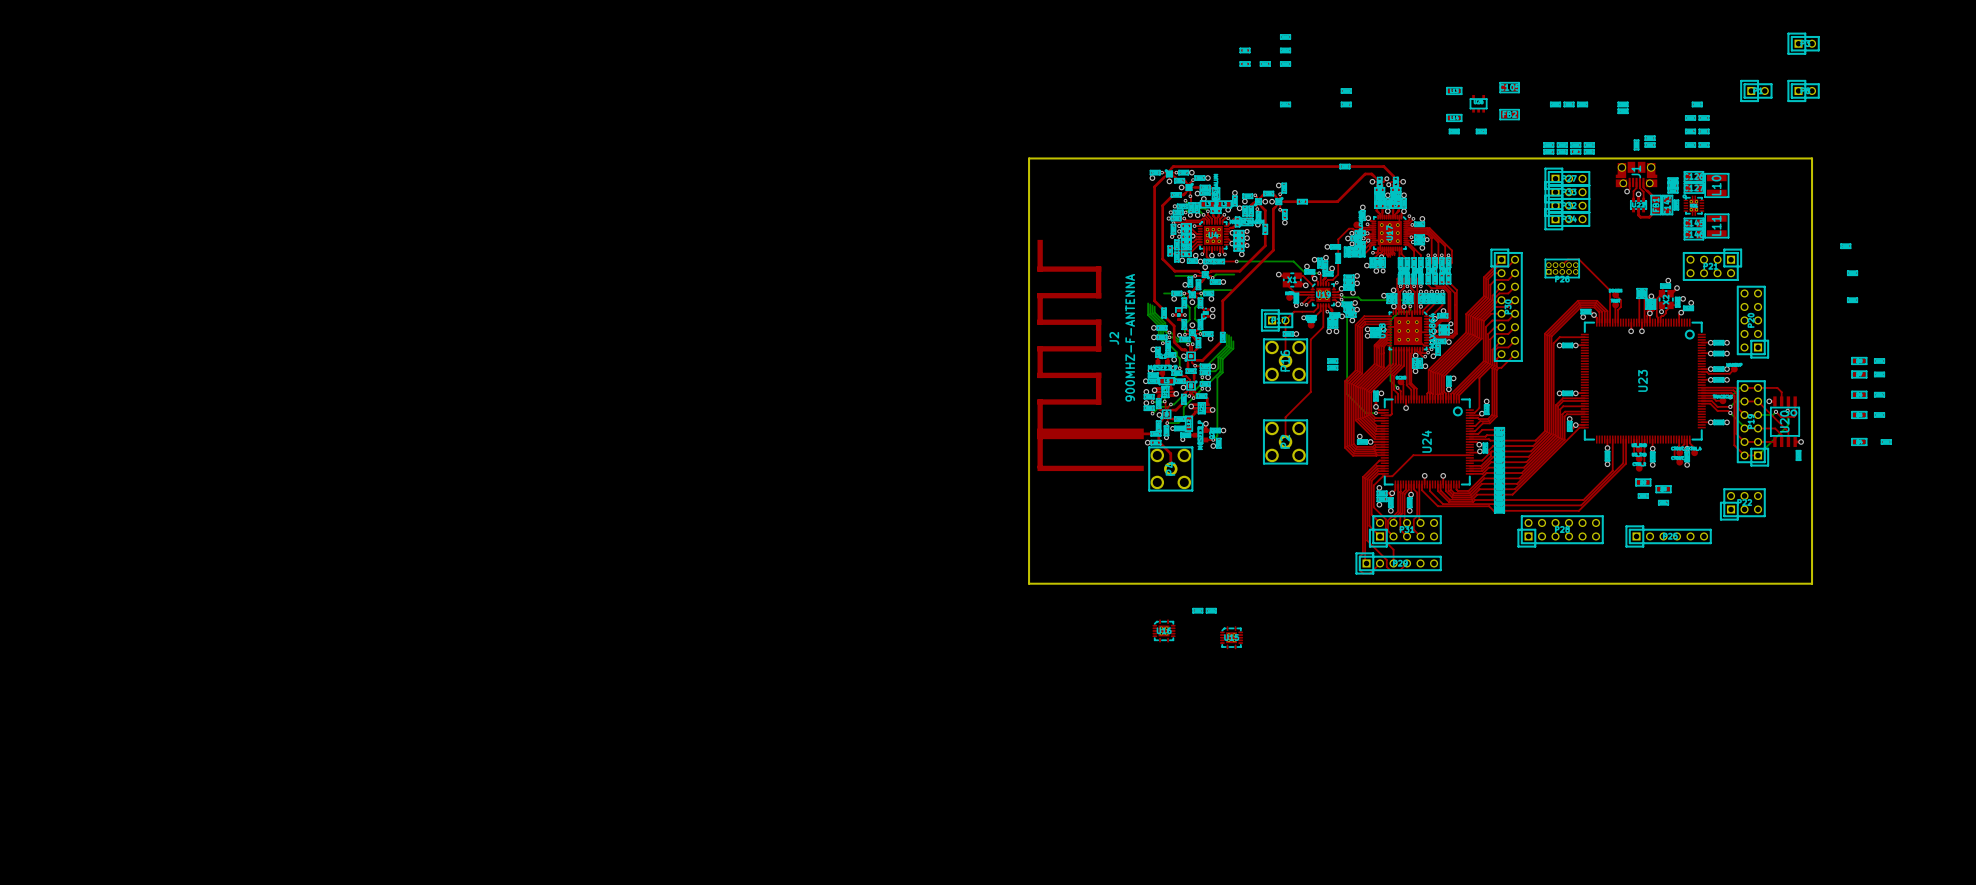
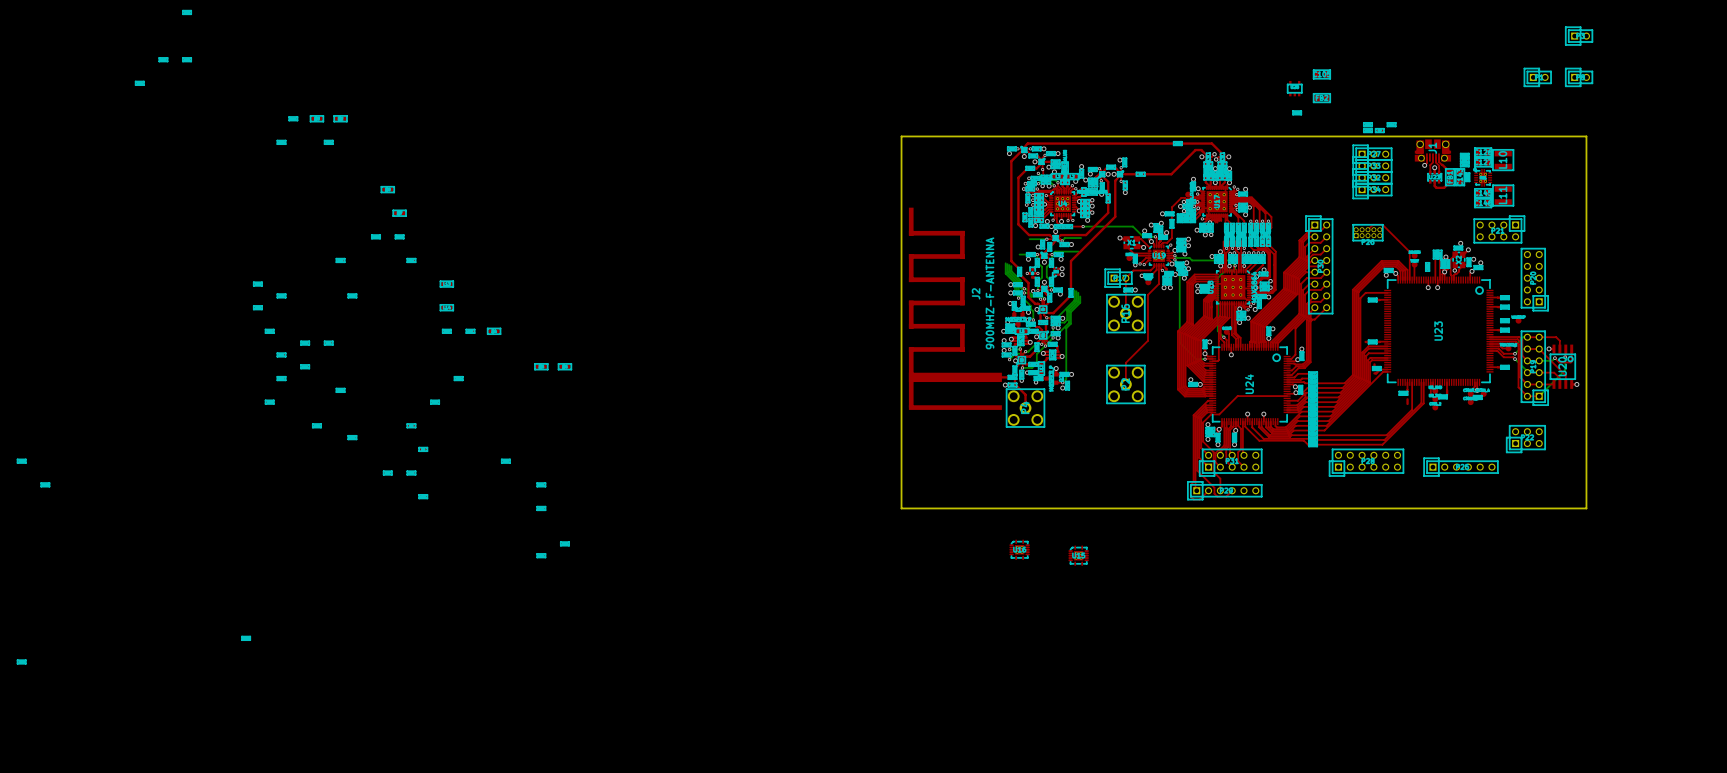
part position: (1285, 36) -> (293, 118)
part position: (1245, 50) -> (423, 449)
part position: (1285, 50) -> (281, 142)
part position: (1245, 63) -> (411, 425)
part position: (1265, 63) -> (328, 343)
part position: (1285, 63) -> (328, 142)
part position: (1346, 90) -> (458, 378)
part position: (1454, 90) -> (446, 284)
part position: (1285, 104) -> (411, 260)
part position: (1346, 104) -> (340, 260)
part position: (1555, 104) -> (281, 295)
part position: (1569, 104) -> (305, 366)
part position: (1582, 104) -> (305, 343)
part position: (1623, 104) -> (376, 236)
part position: (1697, 104) -> (564, 543)
part position: (1623, 111) -> (399, 236)
part position: (1454, 117) -> (446, 307)
part position: (1690, 117) -> (505, 461)
part position: (1704, 117) -> (411, 473)
part position: (1454, 131) -> (246, 638)
part position: (1690, 131) -> (470, 331)
part position: (1704, 131) -> (446, 331)
part position: (1650, 138) -> (187, 59)
part position: (1548, 144) -> (163, 59)
part position: (1575, 144) -> (340, 390)
part position: (1636, 144) -> (1427, 266)
part position: (1650, 144) -> (541, 508)
part position: (1690, 144) -> (541, 484)
part position: (1704, 144) -> (435, 402)
part position: (1548, 151) -> (387, 473)
part position: (1589, 151) -> (139, 83)
part position: (1845, 246) -> (187, 12)
part position: (1852, 273) -> (352, 295)
top track: (1615, 294) (1621, 300) (1621, 306) (1618, 309) (1618, 322) -> none
part position: (1852, 300) -> (257, 284)
via: (1710, 342) -> none
via: (1726, 342) -> none
via: (1559, 345) -> none
via: (1575, 345) -> none
via: (1710, 353) -> none
via: (1726, 353) -> none
part position: (1332, 360) -> (21, 461)
part position: (1859, 360) -> (387, 189)
part position: (1879, 360) -> (423, 496)
part position: (1332, 367) -> (21, 661)
top track: (1701, 369) (1710, 369) -> none
via: (1710, 369) -> none
via: (1726, 369) -> none
top track: (1734, 369) (1729, 373) (1708, 373) (1701, 371) -> none
part position: (1859, 374) -> (399, 213)
part position: (1879, 374) -> (257, 307)
via: (1710, 379) -> none
via: (1726, 379) -> none
via: (1559, 393) -> none
via: (1575, 393) -> none
part position: (1859, 394) -> (564, 366)
part position: (1879, 394) -> (541, 555)
part position: (1859, 414) -> (541, 366)
part position: (1879, 414) -> (352, 437)
via: (1569, 419) -> none
via: (1710, 422) -> none
via: (1726, 422) -> none
via: (1575, 425) -> none
part rotation: 0° (1569, 426) -> 90° clockwise (1376, 368)
top track: (1644, 439) (1644, 463) (1639, 468) -> none
top track: (1679, 439) (1679, 446) (1674, 450) (1674, 457) (1679, 462) -> none
top track: (1689, 439) (1689, 443) (1694, 448) (1694, 452) -> none
part position: (1859, 441) -> (494, 331)
part position: (1886, 441) -> (269, 331)
via: (1607, 448) -> none
via: (1652, 448) -> none
part rotation: 0° (1798, 455) -> 90° clockwise (45, 484)
part position: (1798, 455) -> (45, 484)
part rotation: 0° (1607, 456) -> 90° clockwise (1403, 393)
part rotation: 0° (1652, 456) -> 90° clockwise (1442, 396)
part rotation: 0° (1687, 456) -> 90° clockwise (1477, 397)
via: (1607, 464) -> none
via: (1652, 464) -> none
via: (1687, 464) -> none
part position: (1643, 482) -> (340, 118)
part position: (1663, 489) -> (316, 118)
part position: (1643, 495) -> (281, 378)
part position: (1663, 502) -> (281, 354)
part position: (1197, 610) -> (269, 402)
part position: (1211, 610) -> (316, 425)

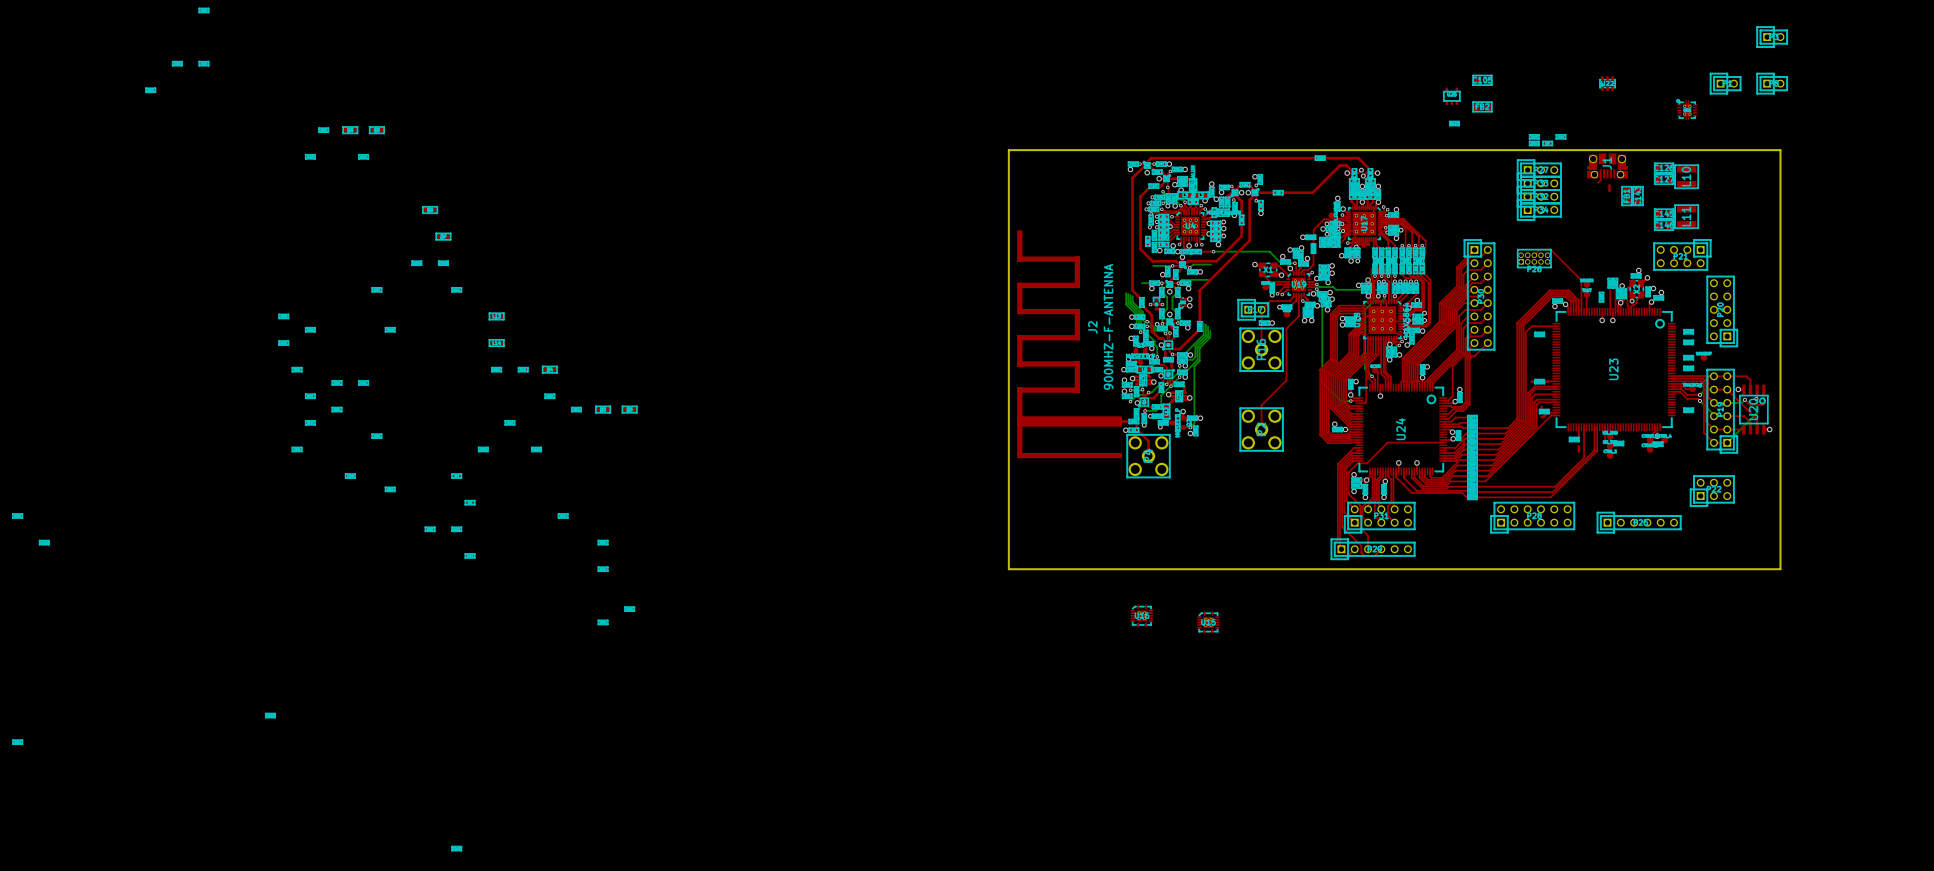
part position: (1464, 155) -> (536, 449)
top track: (1432, 157) (1430, 172) -> none
top track: (1435, 157) (1439, 172) -> none
top track: (1438, 157) (1438, 161) (1450, 172) -> none
part position: (1464, 160) -> (549, 396)
part position: (1464, 164) -> (576, 409)
via: (1424, 165) -> none
via: (1434, 167) -> none
part rotation: 0° (1434, 177) -> 180° (1607, 83)
part position: (1434, 177) -> (1607, 83)
part rotation: 0° (1467, 177) -> 90° clockwise (456, 848)
part position: (1467, 177) -> (456, 848)
part position: (1482, 177) -> (1686, 109)
top track: (1434, 181) (1436, 187) (1444, 187) (1450, 181) -> none
top track: (1489, 297) (1502, 297) -> none
top track: (1387, 299) (1375, 300) -> none
top track: (1489, 306) (1502, 307) -> none
top track: (1489, 330) (1502, 330) -> none
top track: (1489, 367) (1502, 367) -> none
top track: (1446, 382) (1447, 394) -> none

